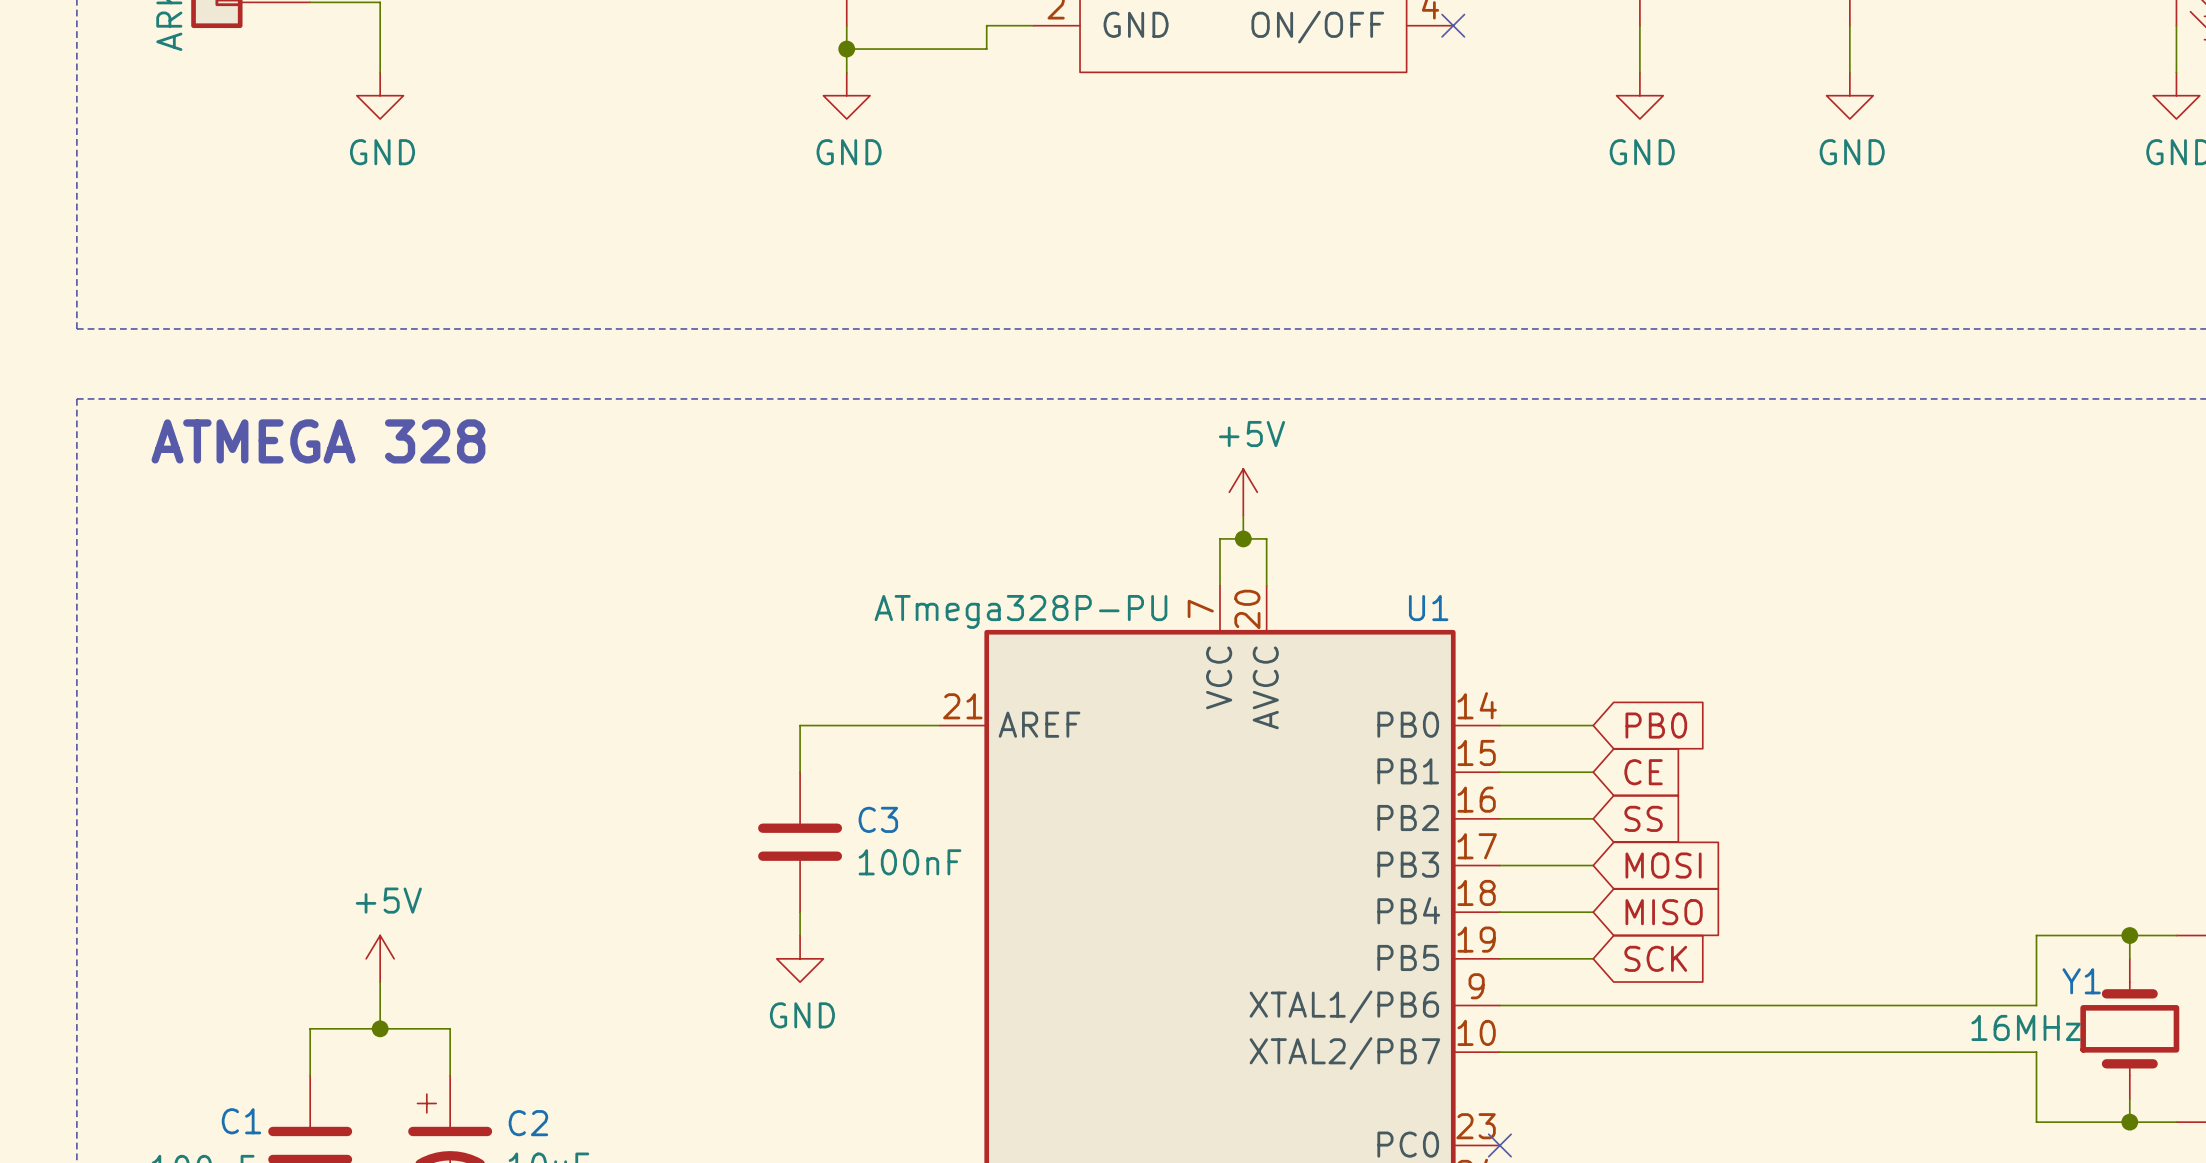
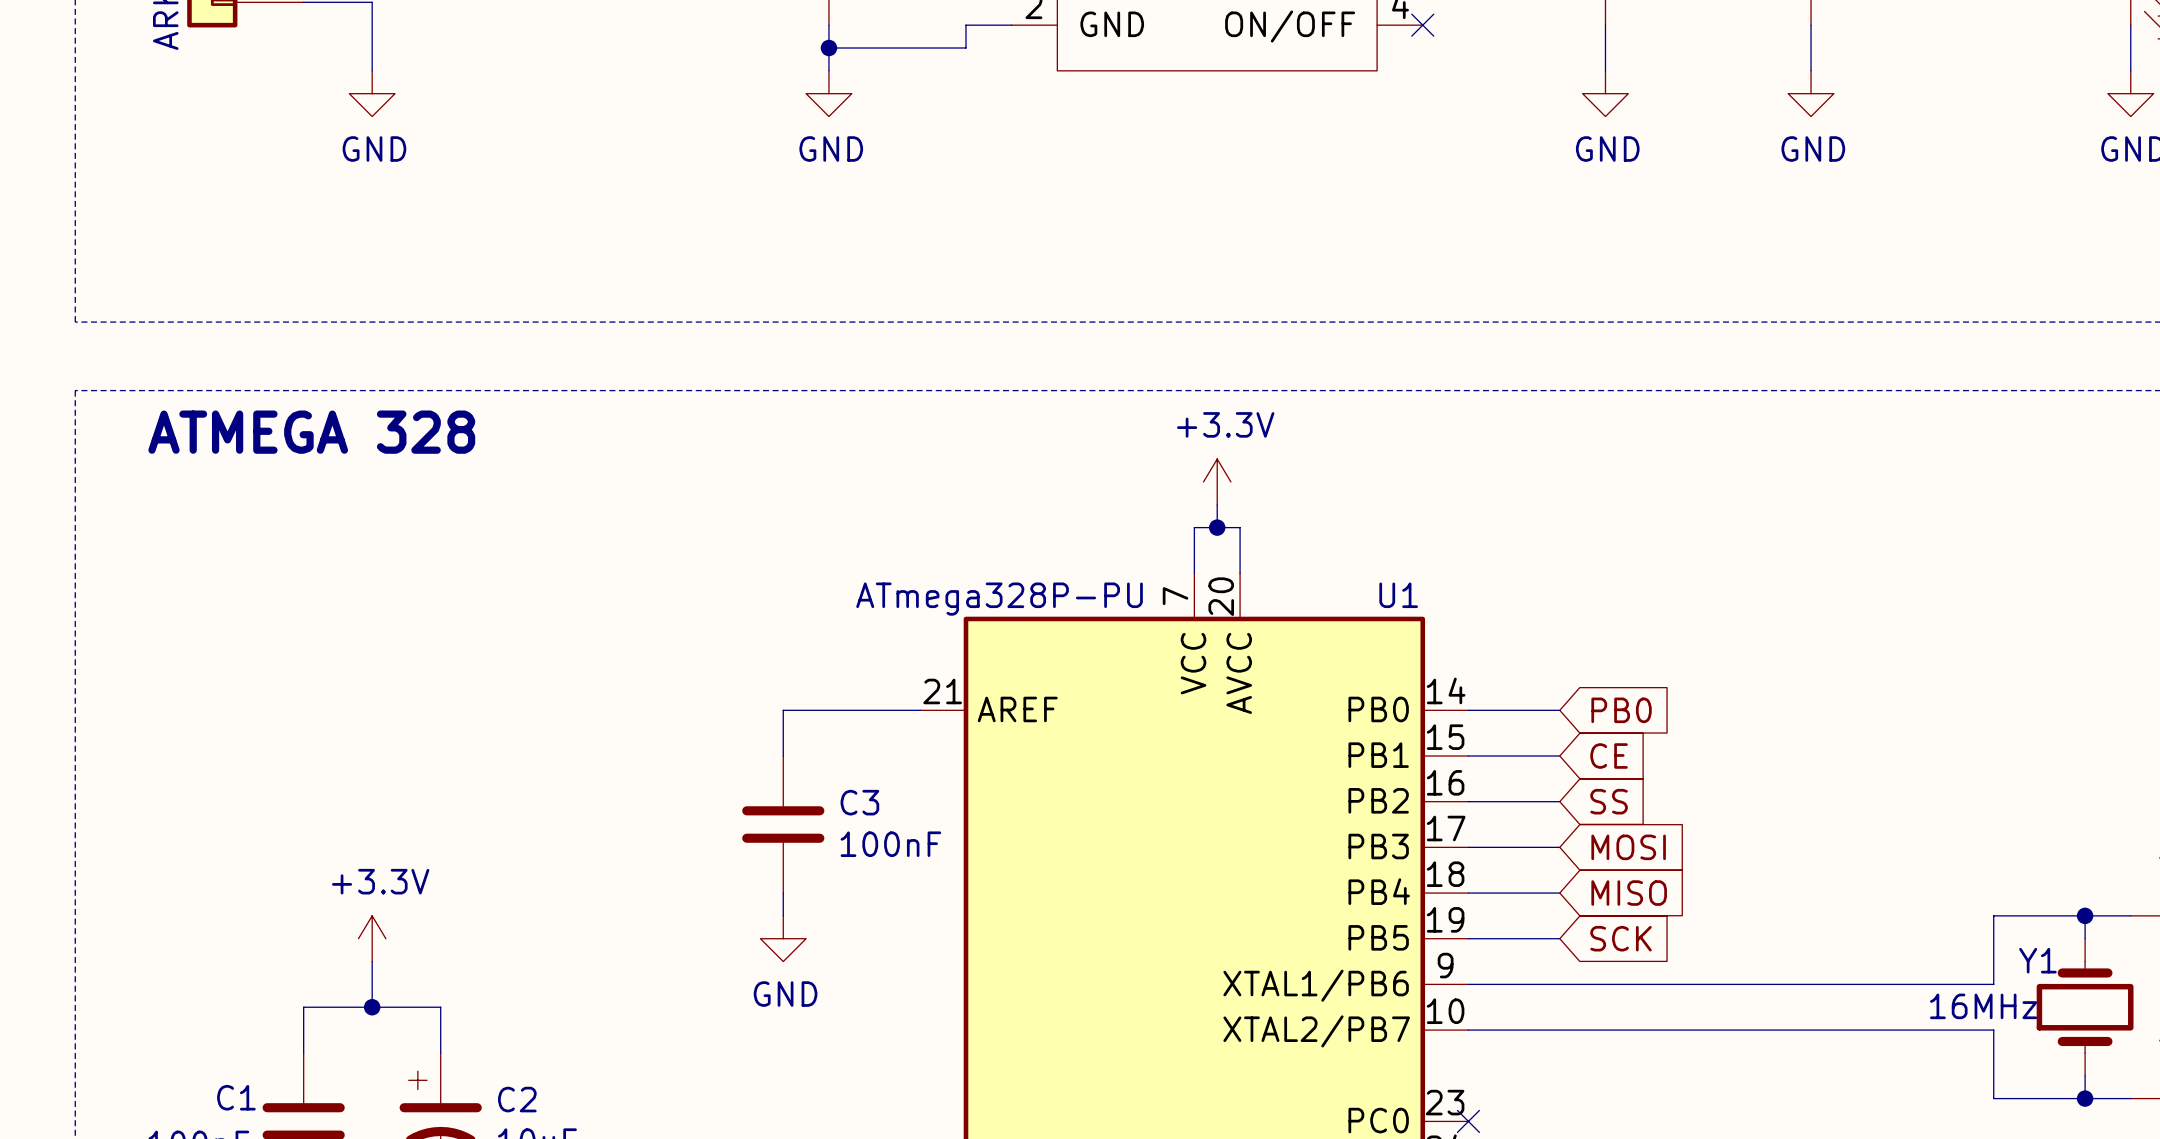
power symbol: +5V (1243, 492) -> +3.3V (1217, 481)
power symbol: +5V (380, 958) -> +3.3V (372, 938)

